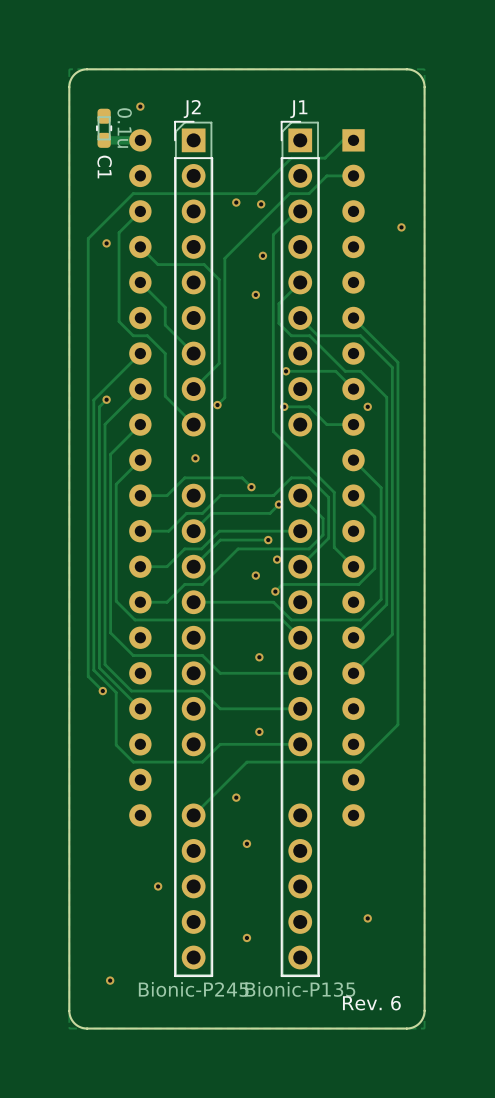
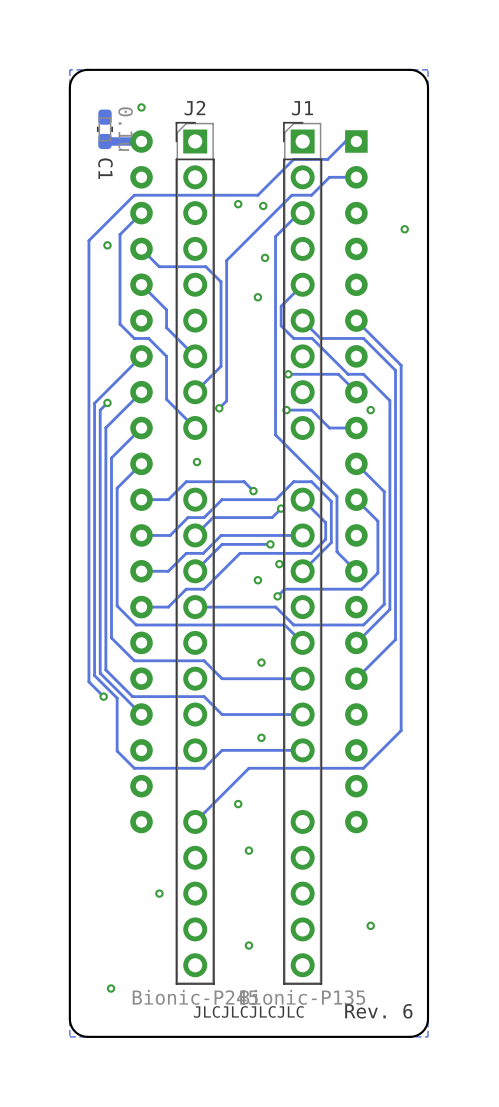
text: none -> JLCJLCJLCJLC (248, 1011)

